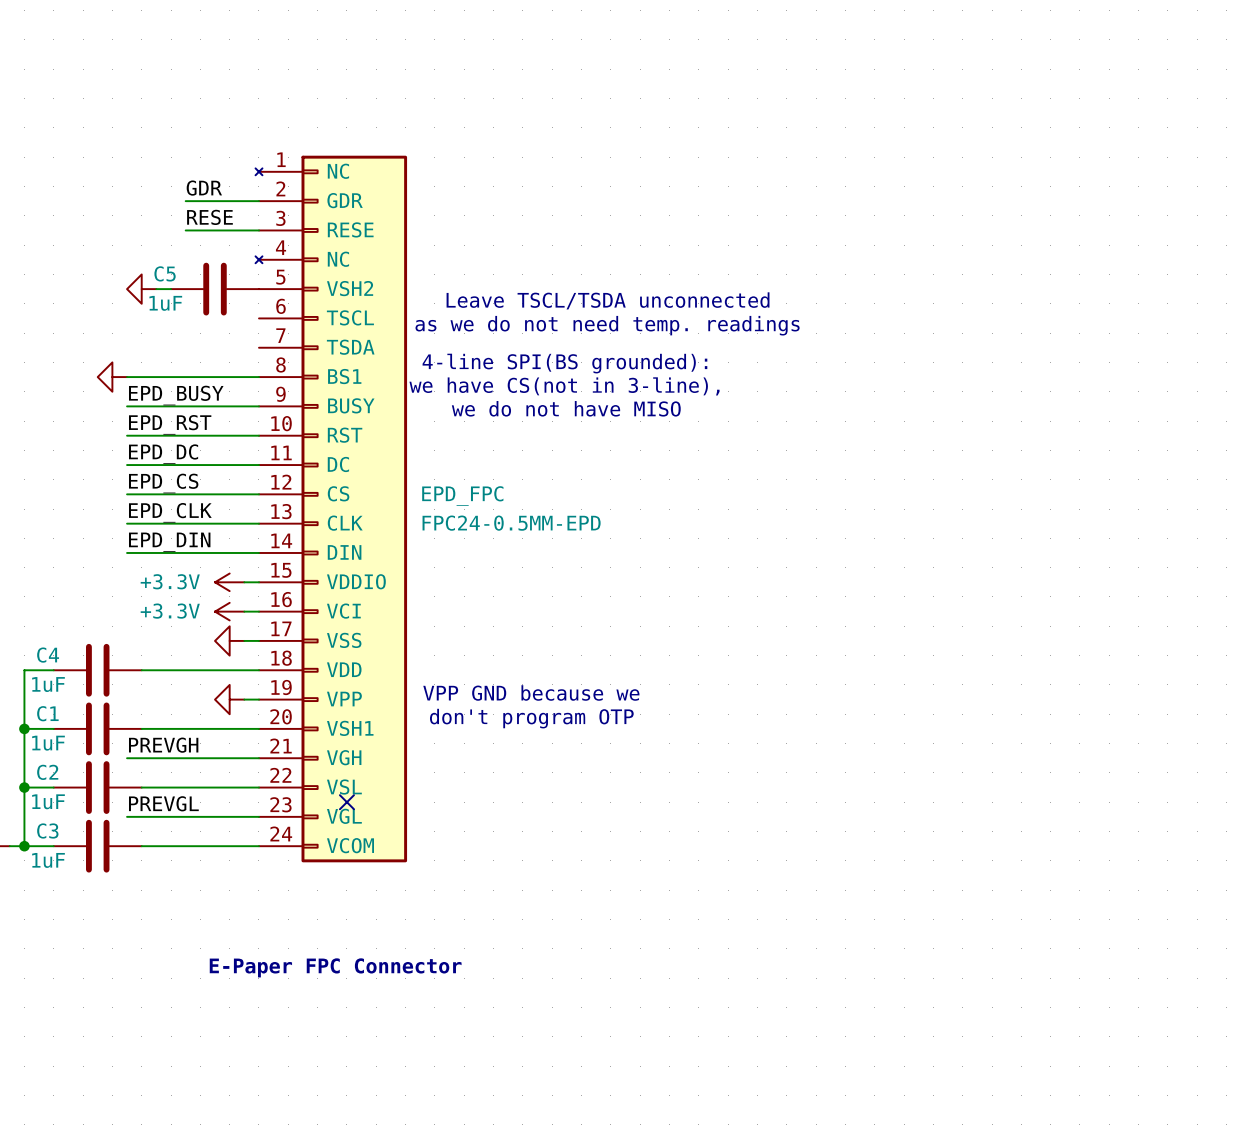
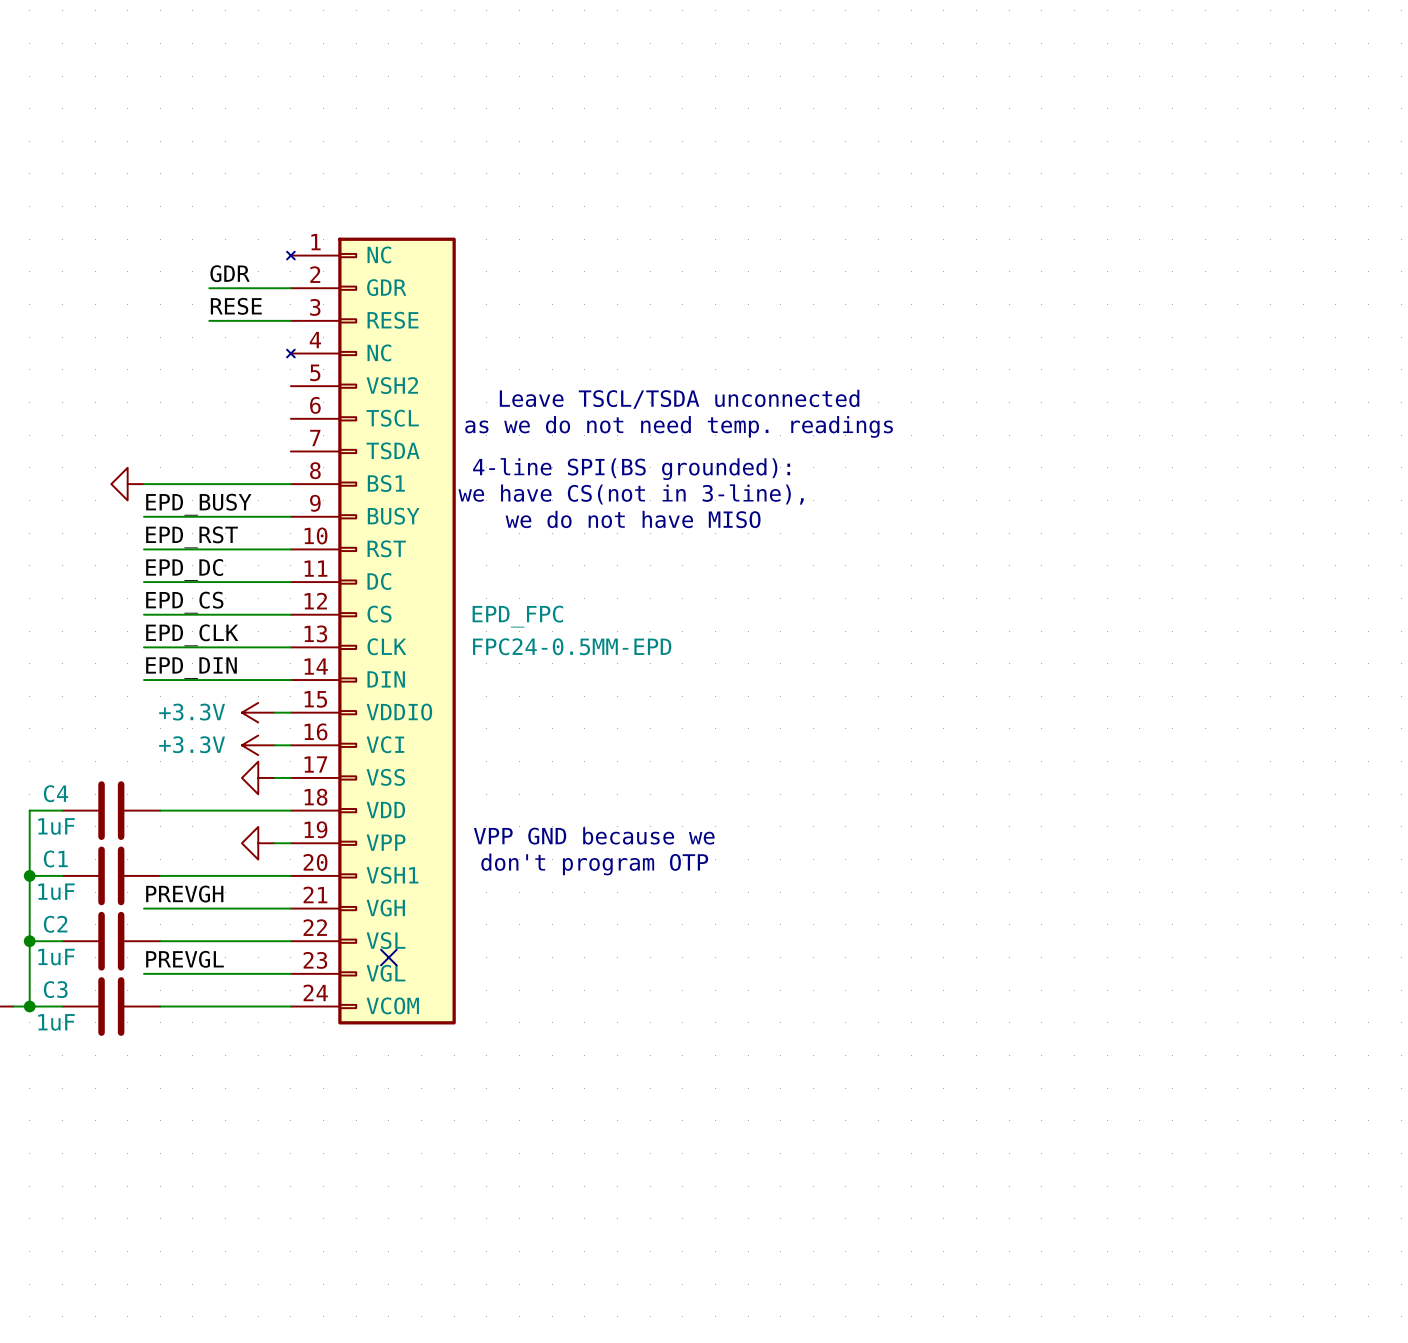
power symbol: (141, 289) -> none
wire: (156, 289) (171, 289) -> none
C5: 1uF (215, 289) -> none
text: E-Paper FPC Connector (335, 967) -> none

